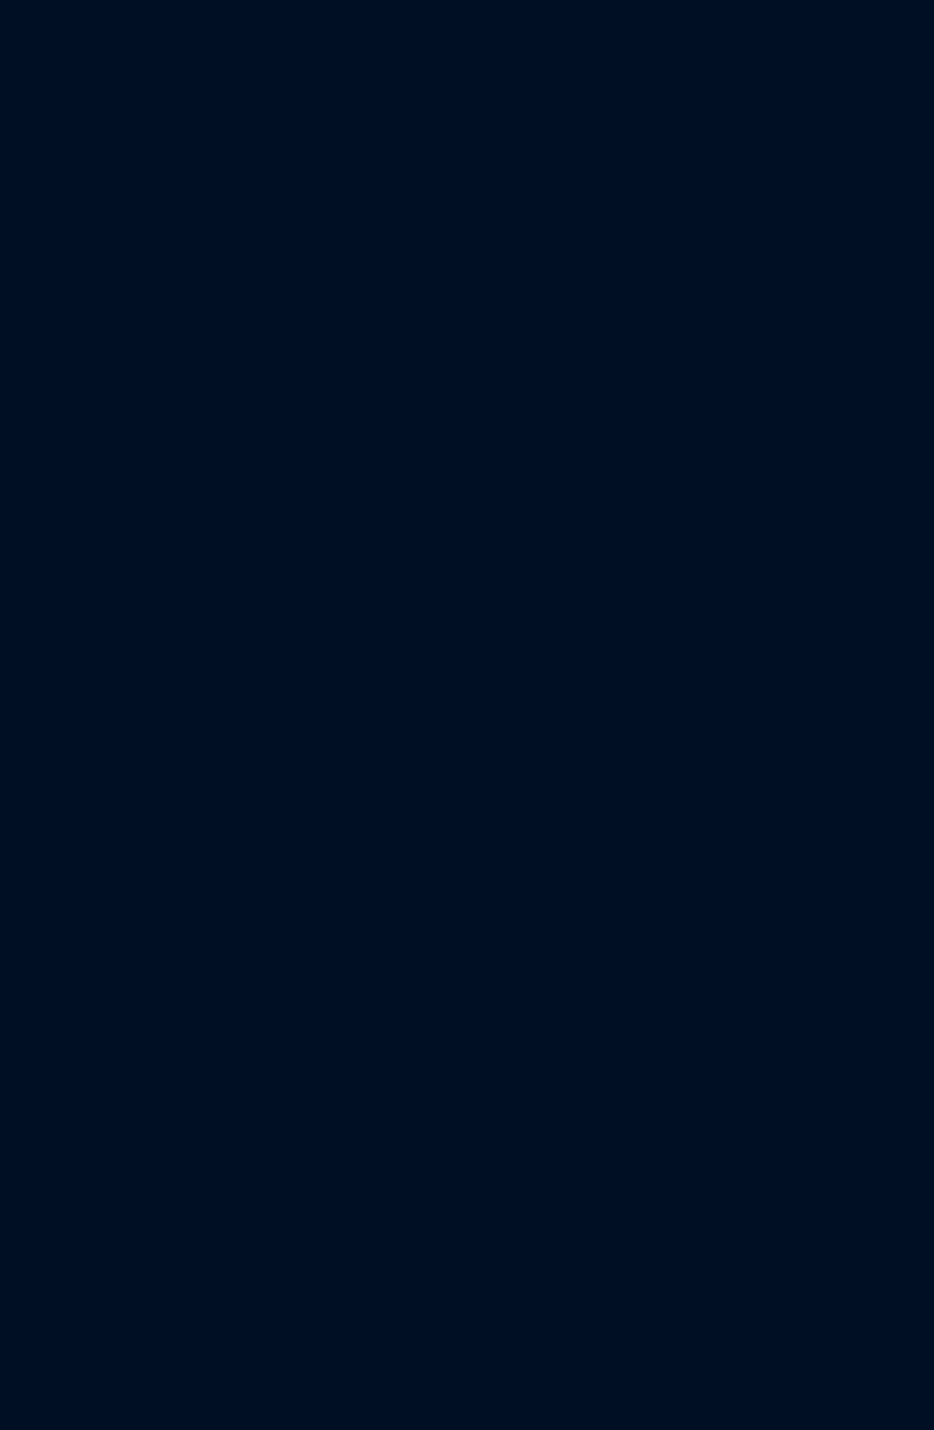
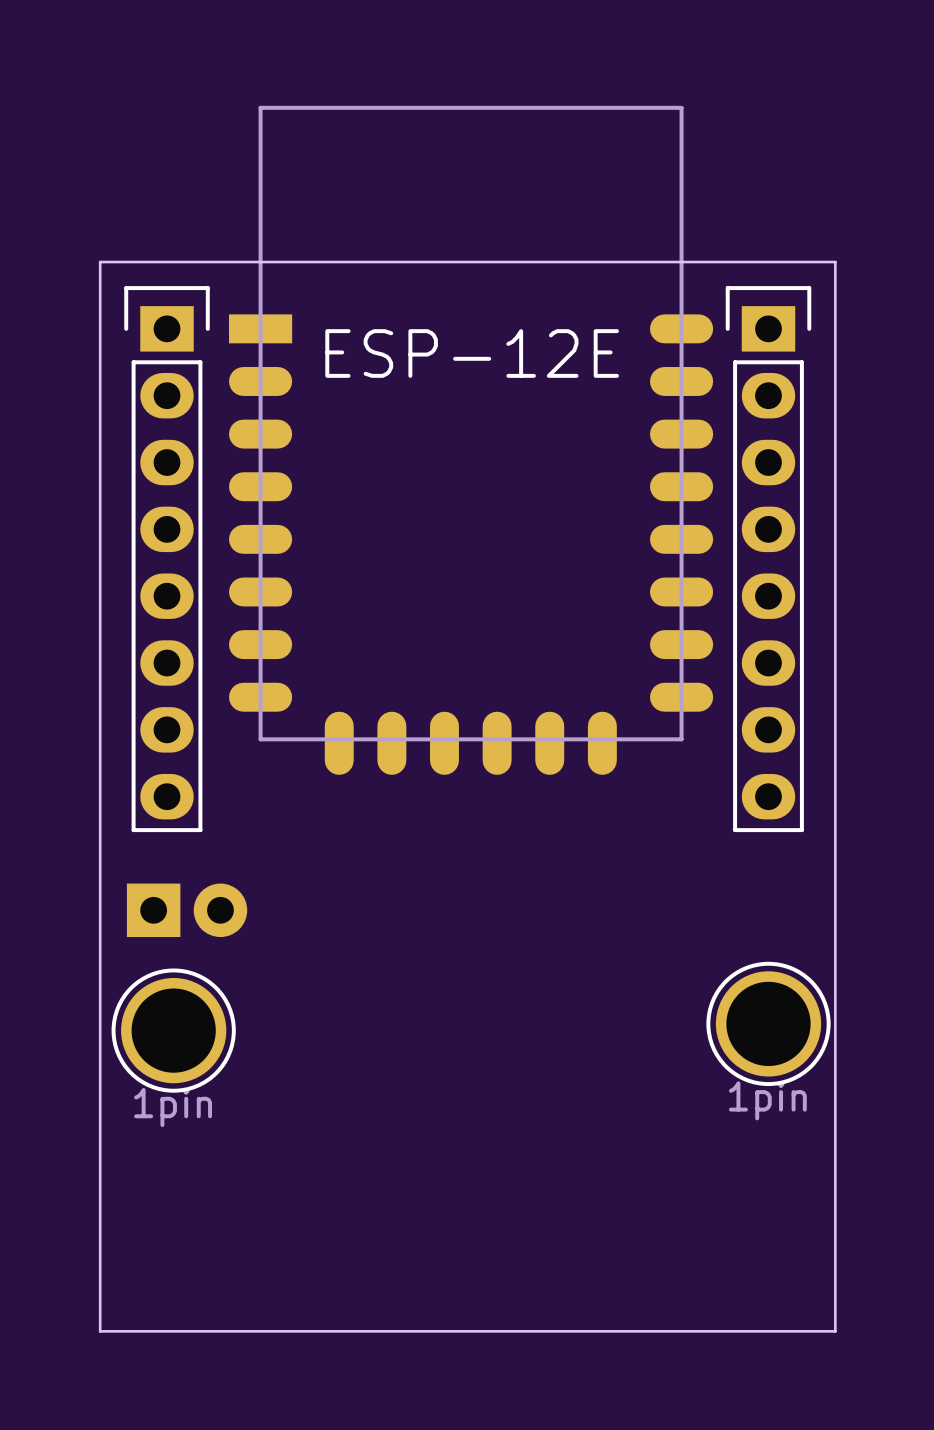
board edge: none -> (100, 262) (100, 1331) (835, 1331) (835, 262) (100, 262)
part: none -> ESP-12E (471, 440)
part: none -> (167, 559)
part: none -> (768, 559)
part: none -> (187, 910)
part: none -> 1pin (768, 1023)
part: none -> 1pin (173, 1030)

